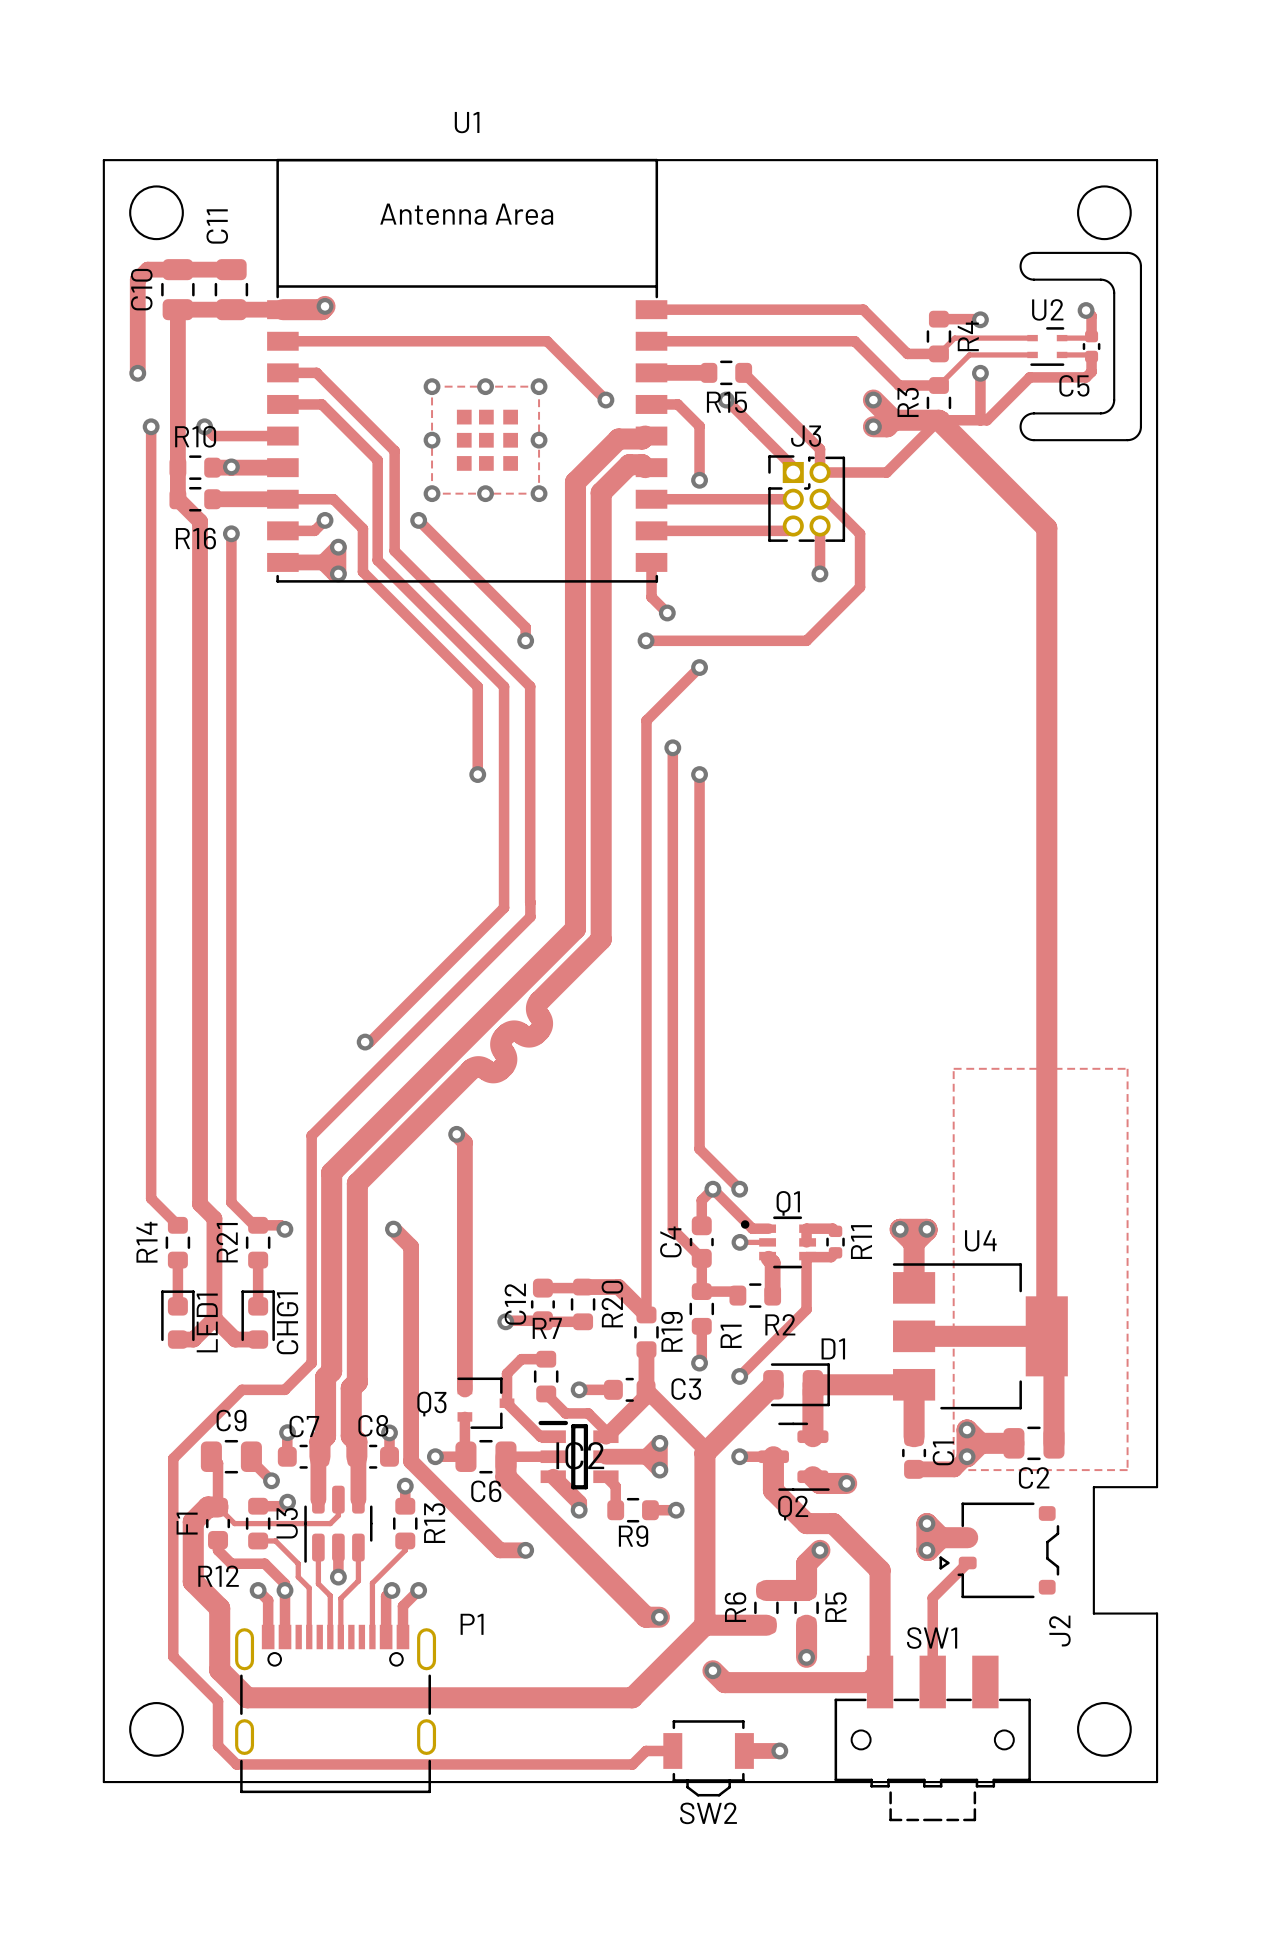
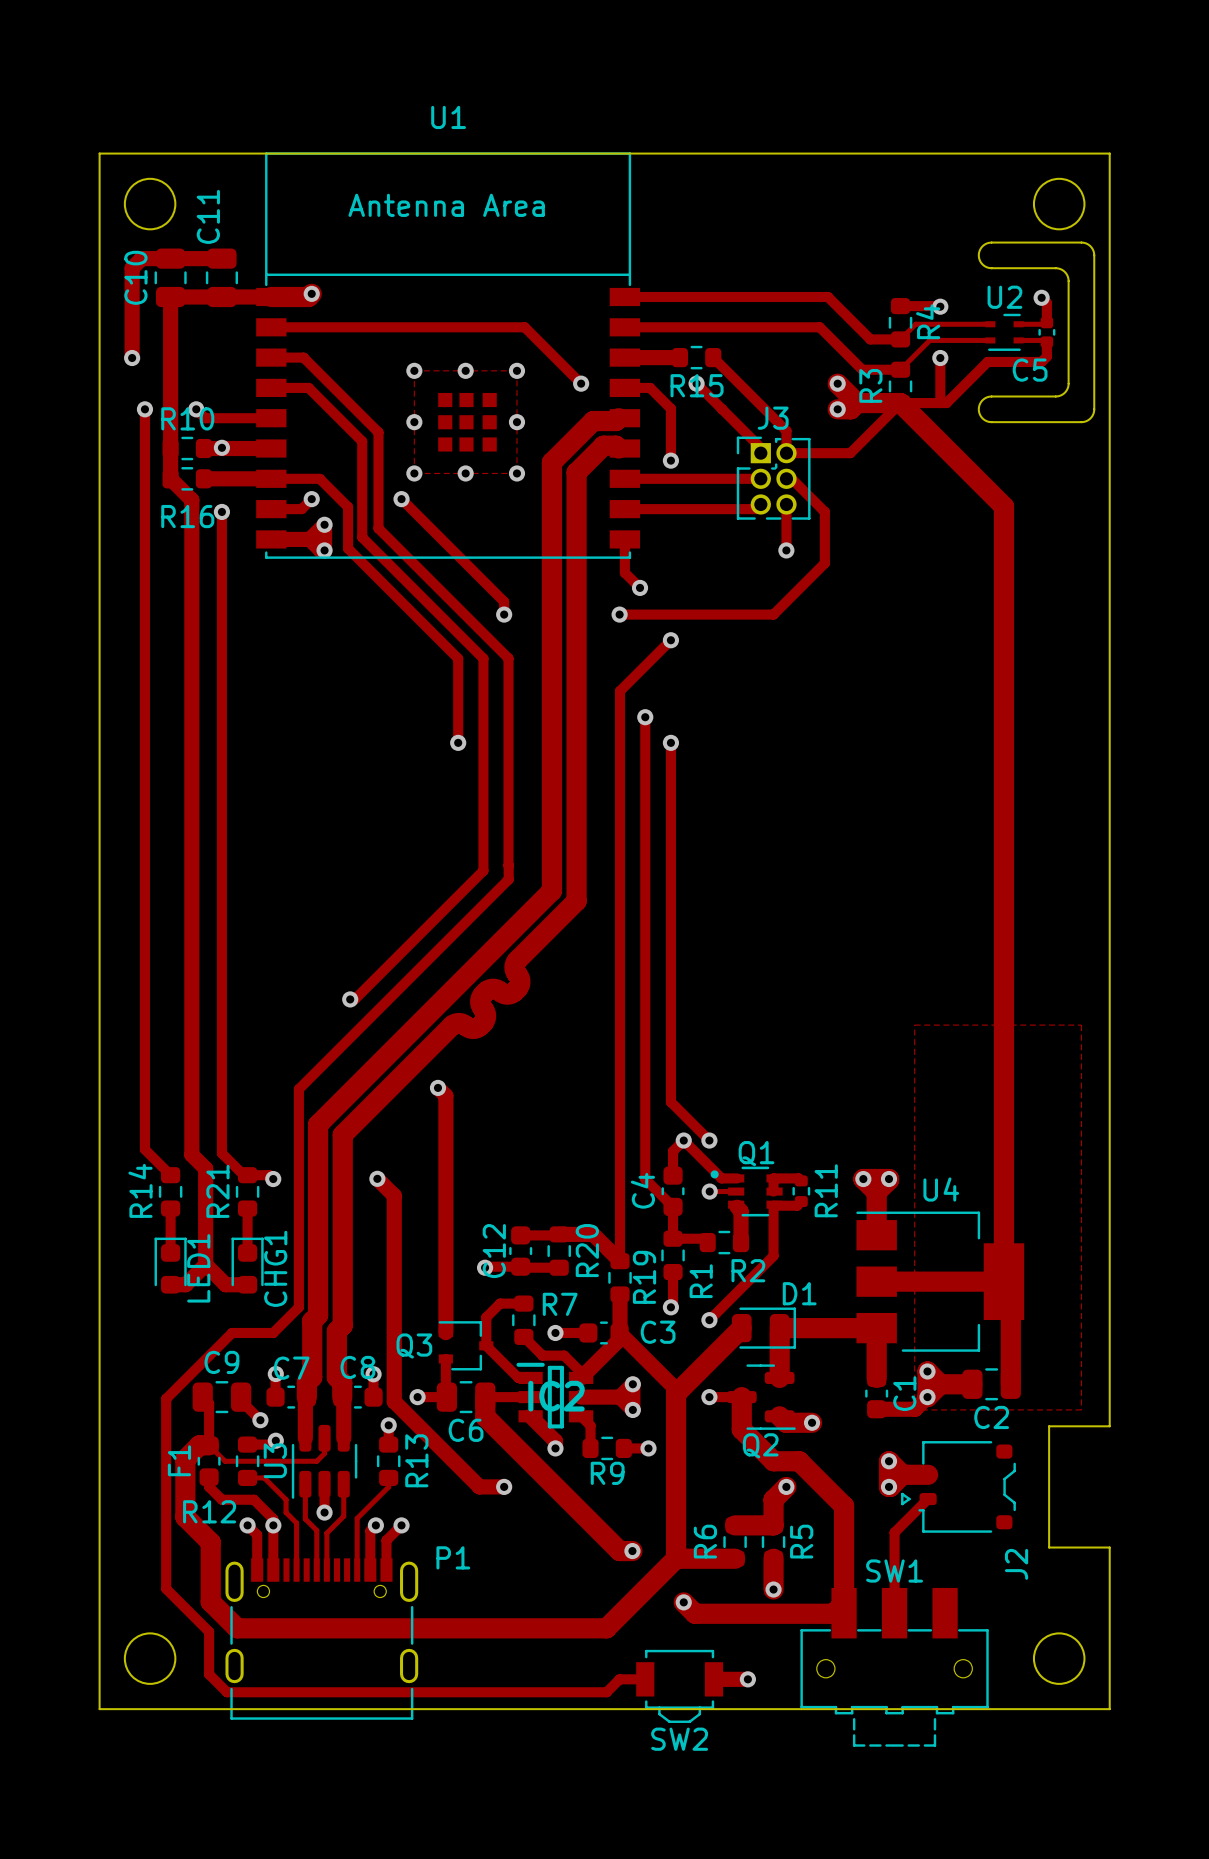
R7 name position: R7 (547, 1328) -> R7 (560, 1304)

